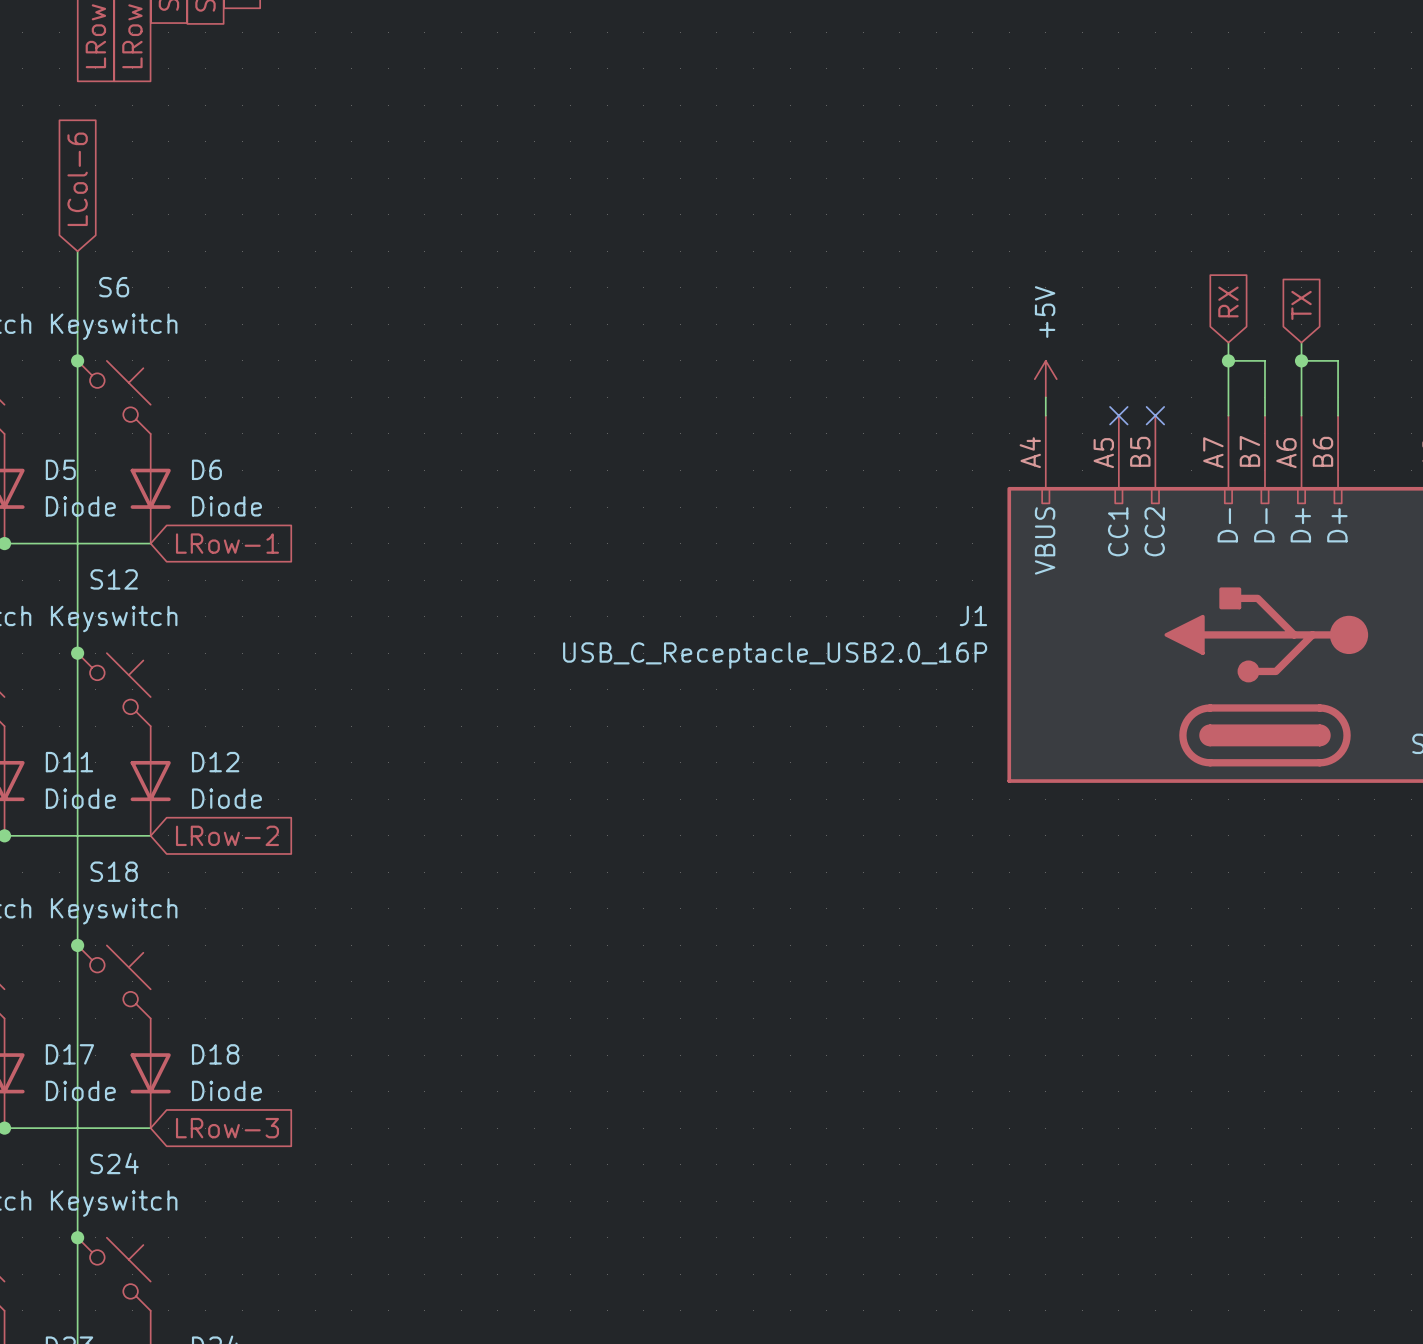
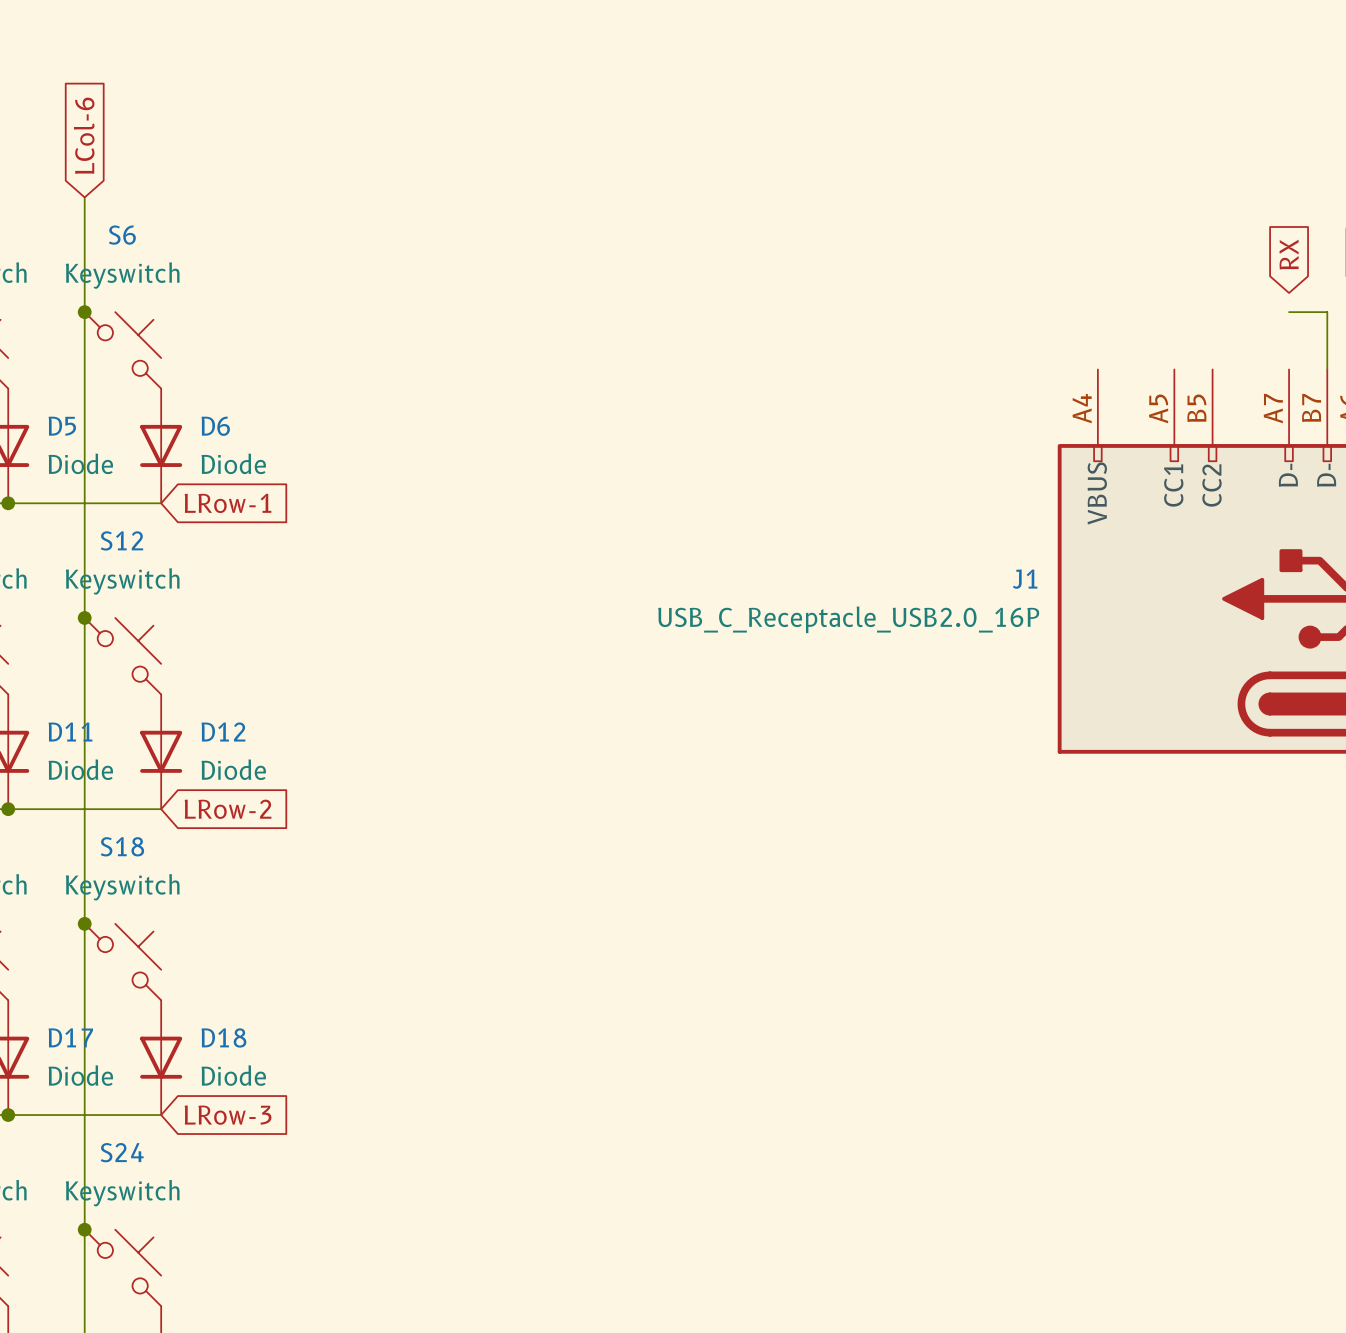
wire: (1228, 342) (1228, 415) -> none
junction: (1228, 360) -> none
power symbol: +5V (1045, 379) -> none
wire: (1045, 397) (1045, 415) -> none
no-connect mark: (1118, 415) -> none
no-connect mark: (1155, 415) -> none

